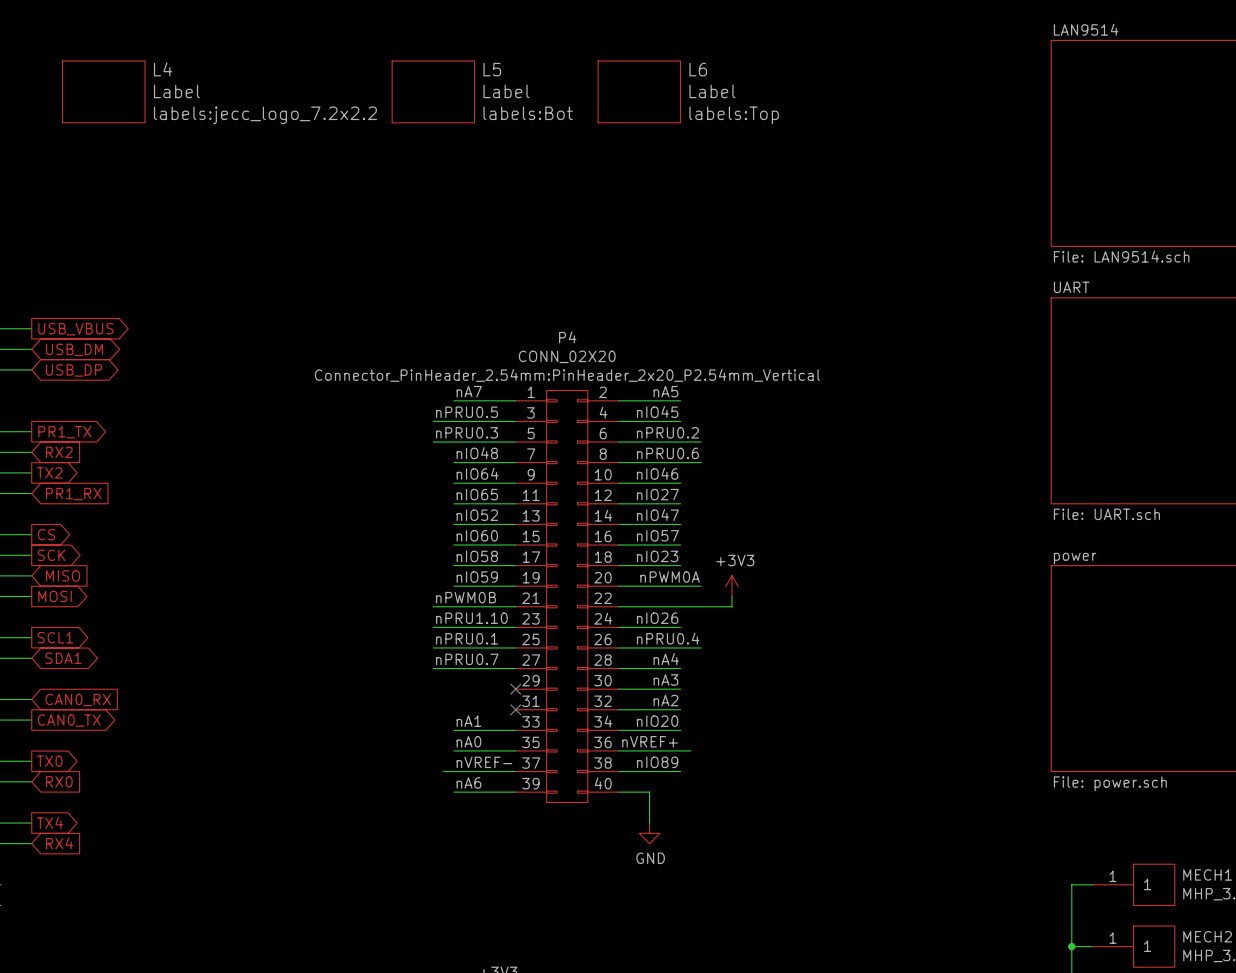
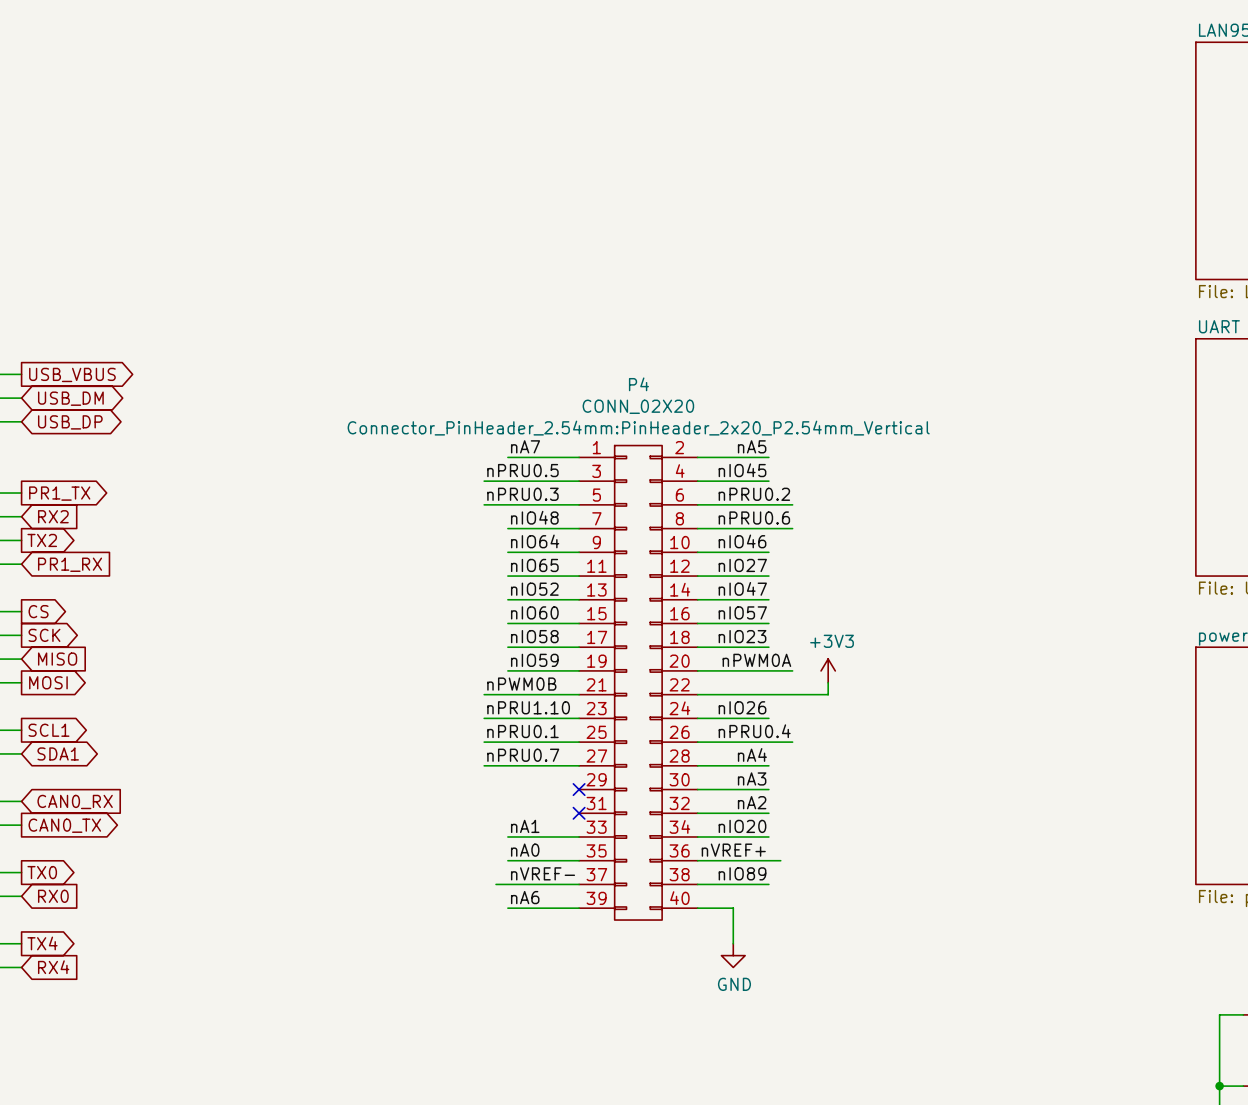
L4: Label (103, 91) -> none
L5: Label (433, 91) -> none
L6: Label (639, 91) -> none

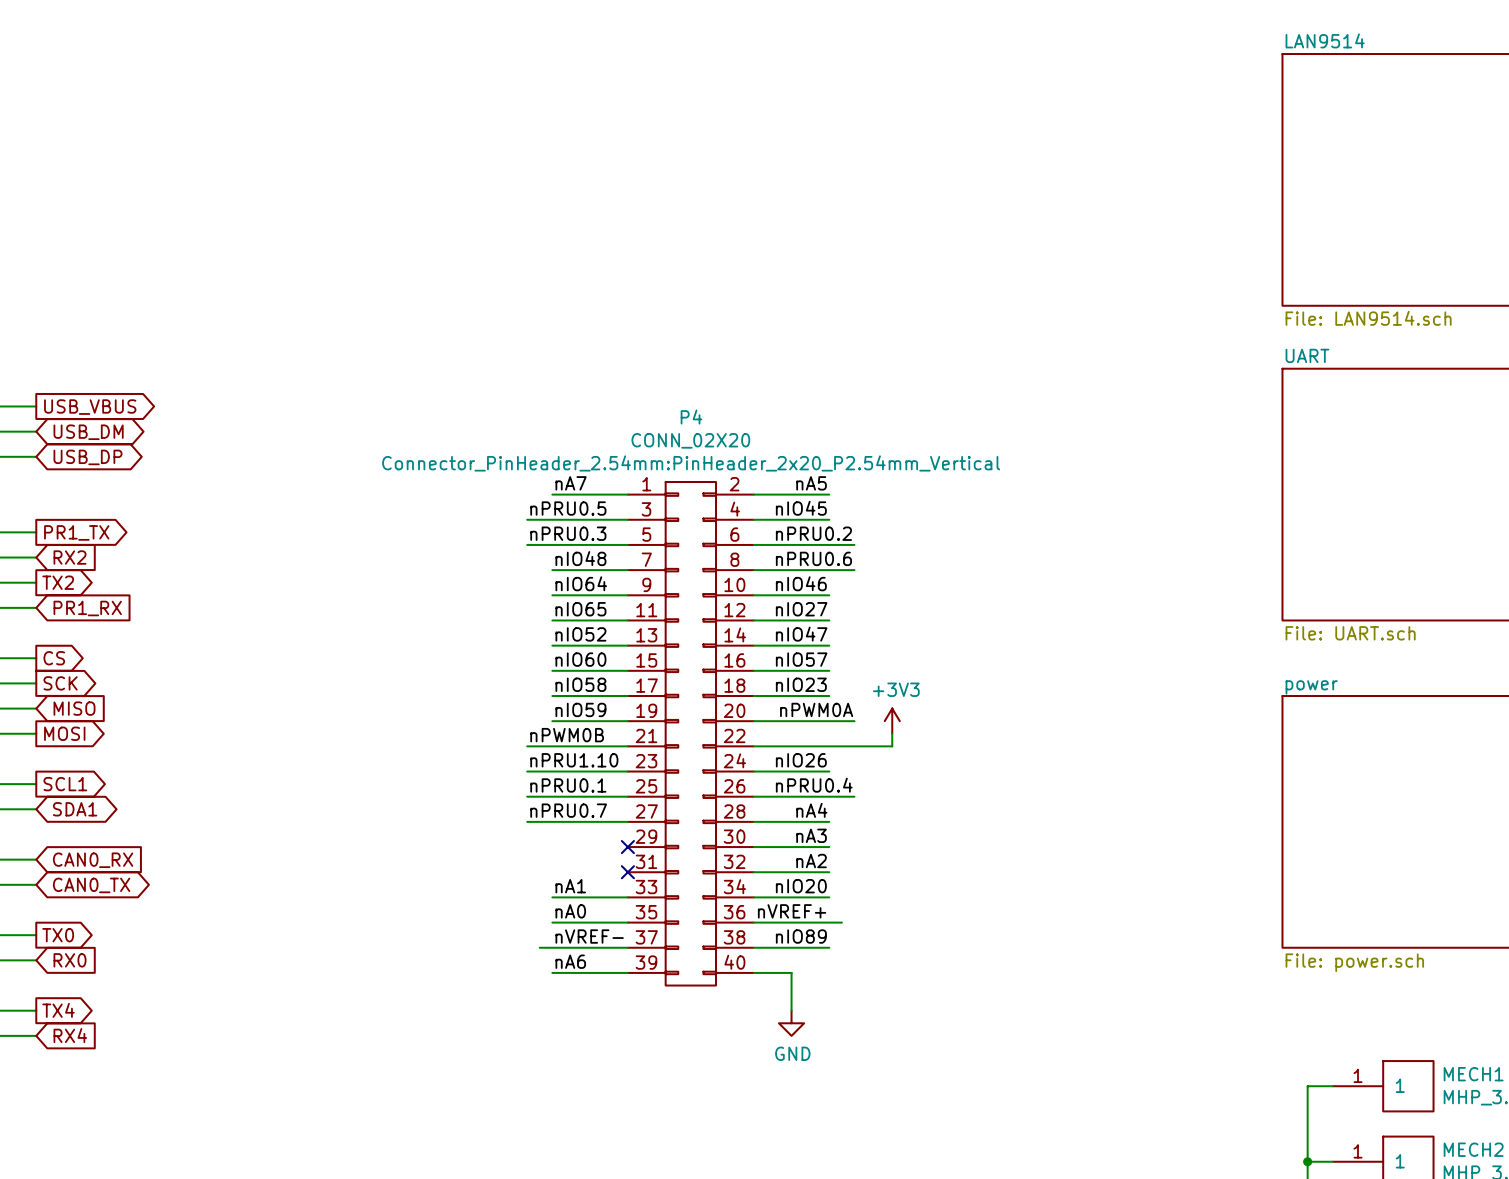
global label shape: output (64, 825) -> bidirectional (91, 885)

